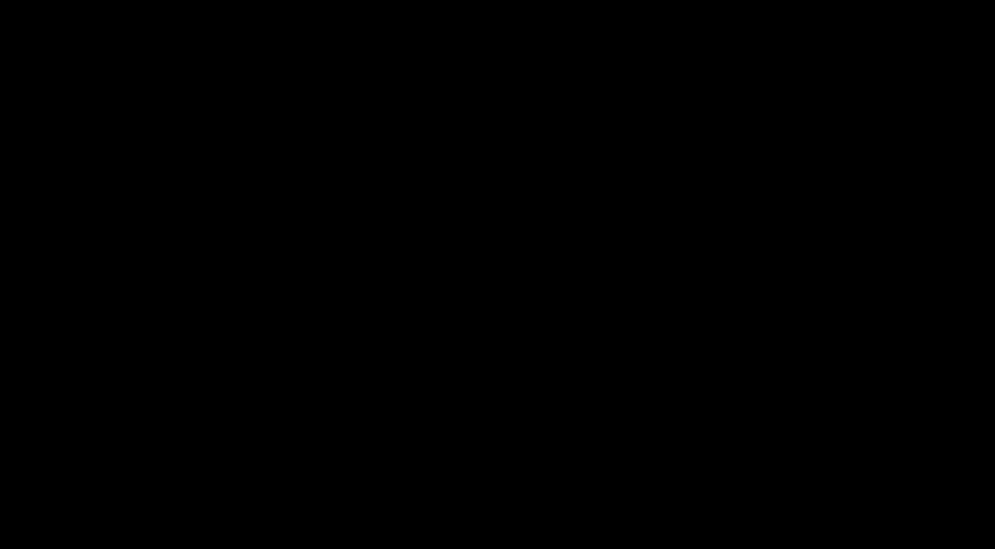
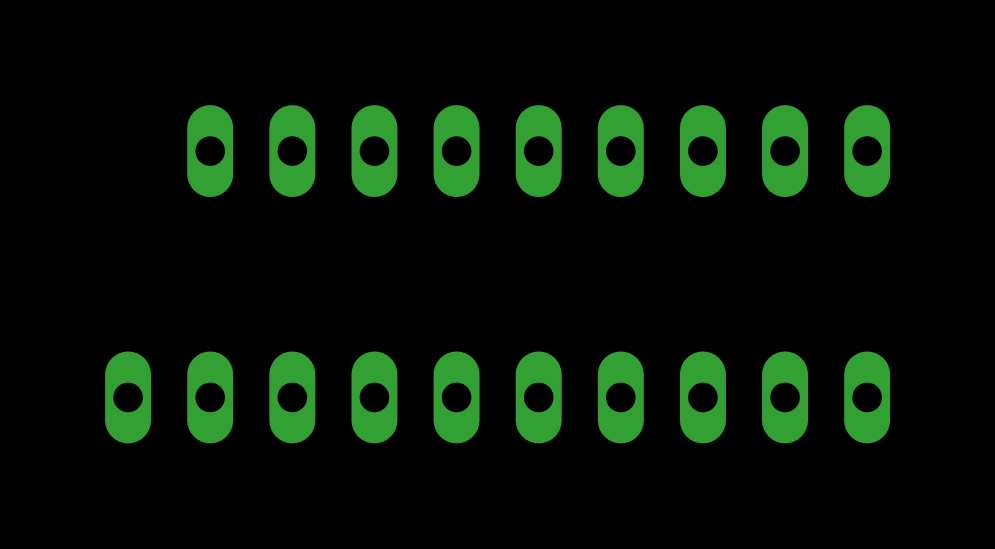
part: none -> (538, 151)
part: none -> (497, 397)

